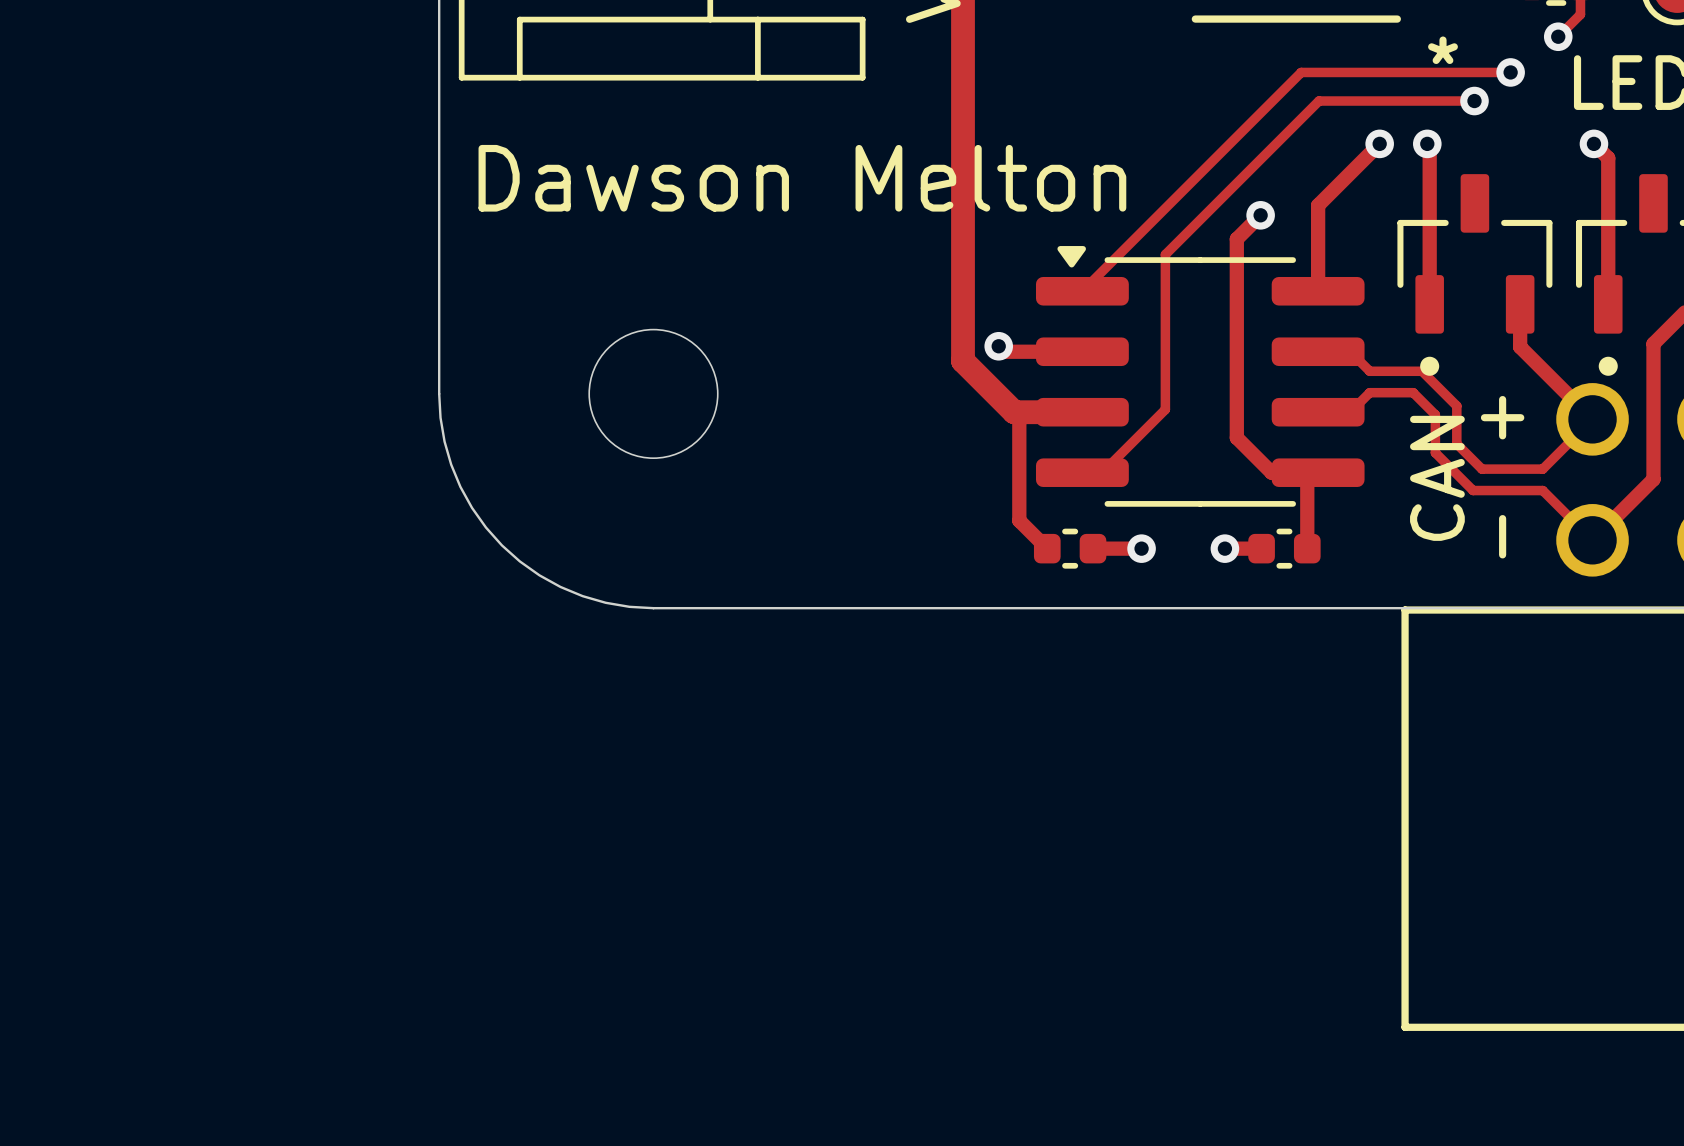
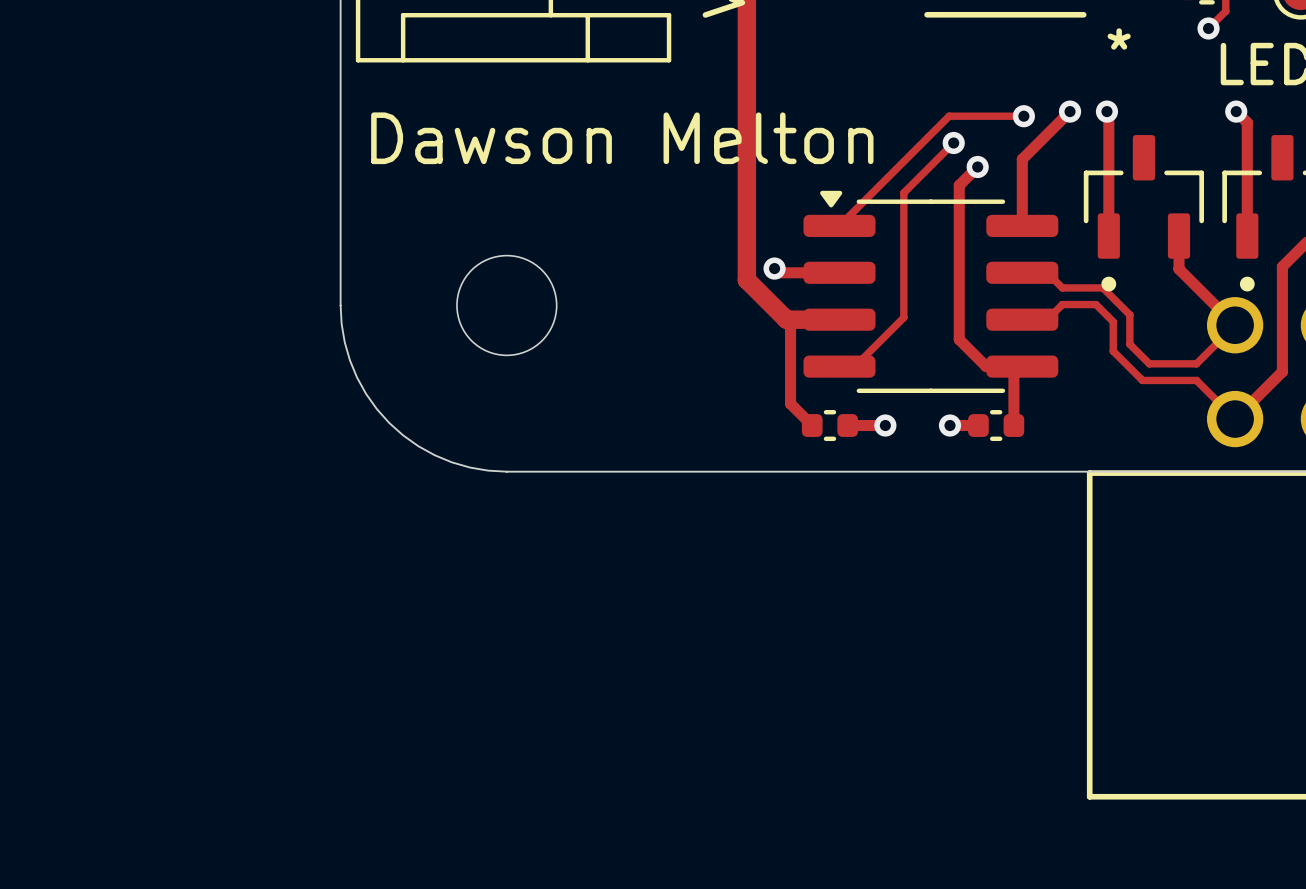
track: (1510, 72) (1301, 72) (1223, 149) -> (1023, 116) (949, 116)
via: (1510, 72) -> none
track: (1474, 101) (1318, 101) (1165, 254) -> (953, 143) (903, 192) (903, 197)
via: (1474, 101) -> none
via: none -> (1023, 116)
via: none -> (953, 143)
text: + (1502, 417) -> none
text: CAN (1437, 478) -> none
text: - (1502, 536) -> none

